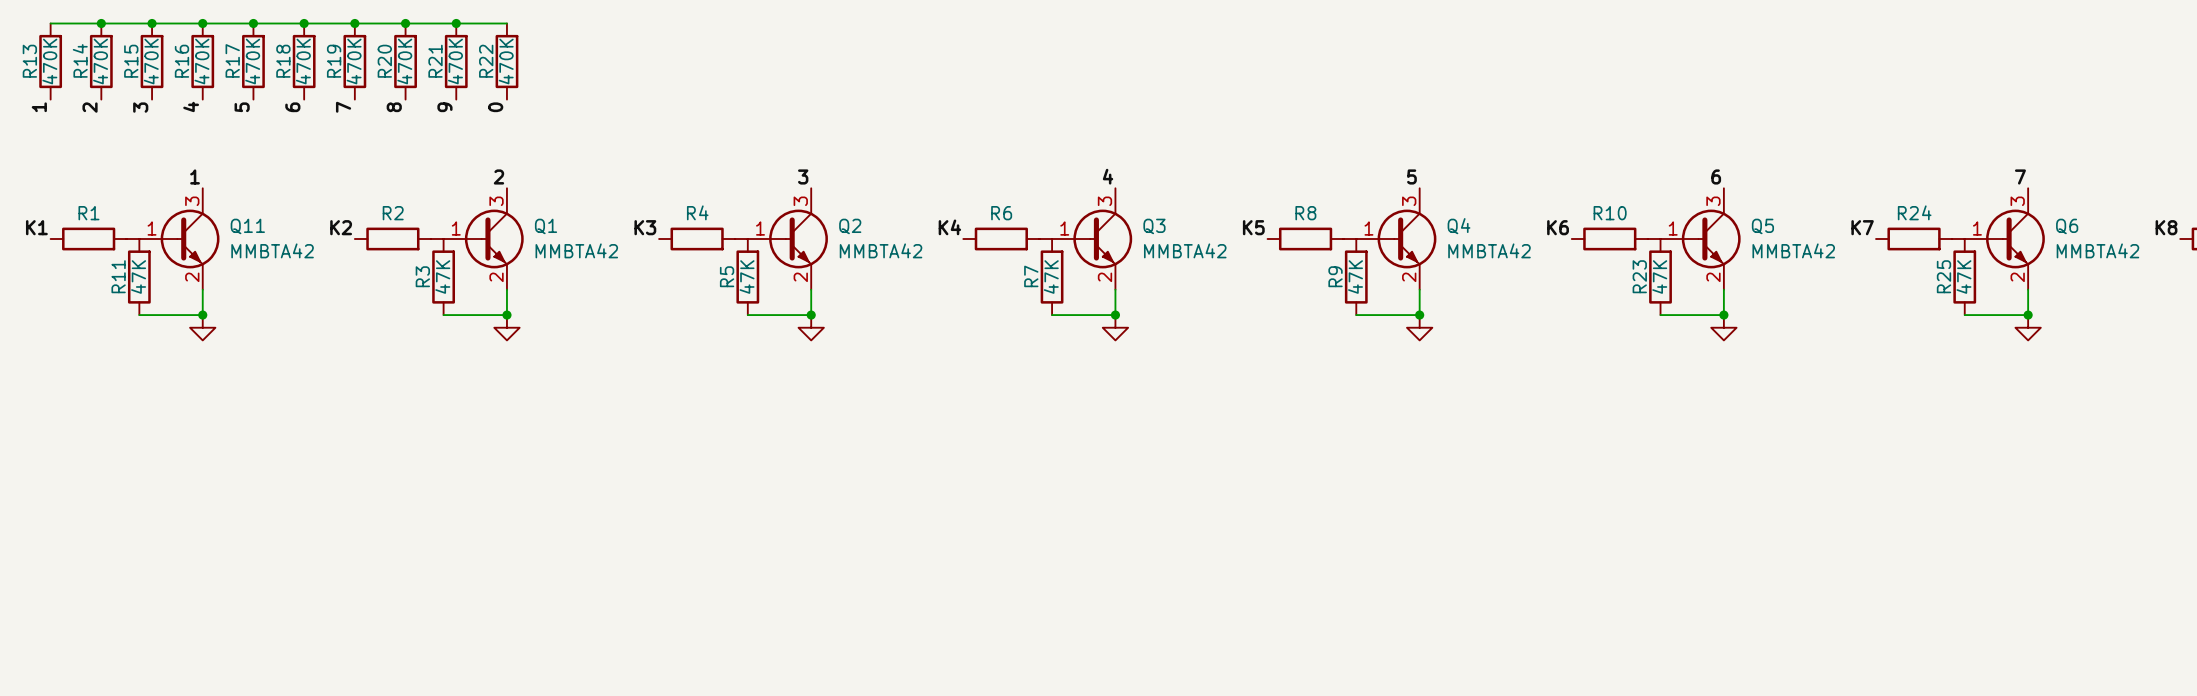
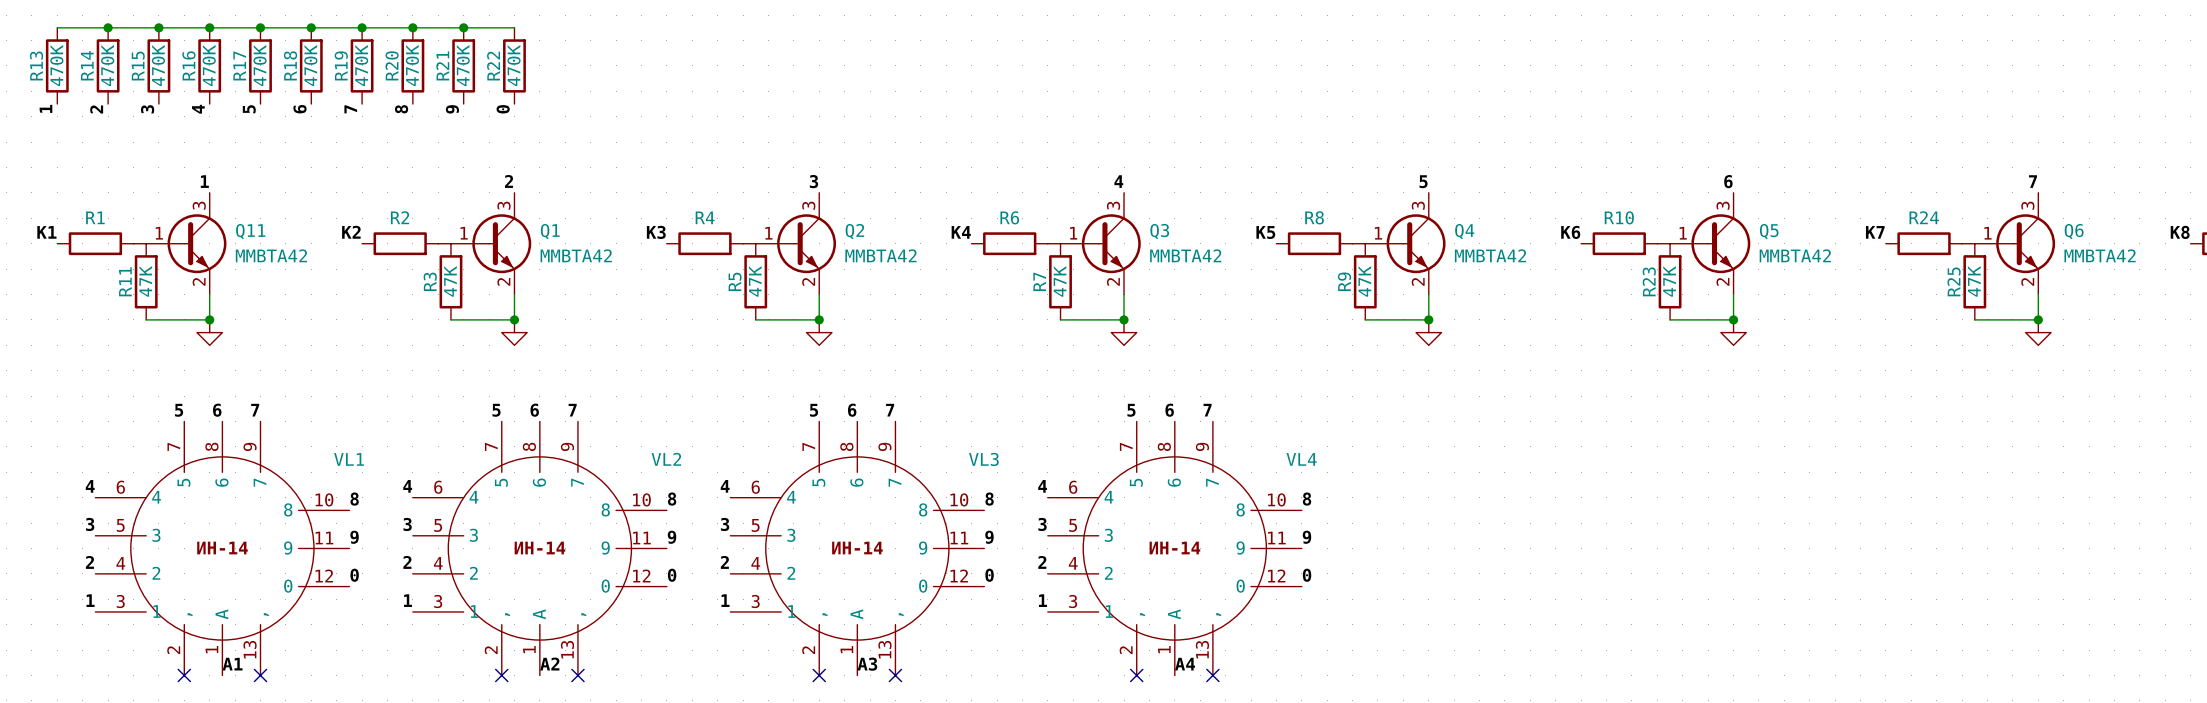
label: none -> 5 (179, 410)
label: none -> 6 (217, 410)
label: none -> 7 (255, 410)
label: none -> 5 (496, 410)
label: none -> 6 (534, 410)
label: none -> 7 (572, 410)
label: none -> 5 (814, 410)
label: none -> 6 (852, 410)
label: none -> 7 (890, 410)
label: none -> 5 (1131, 410)
label: none -> 6 (1169, 410)
label: none -> 7 (1207, 410)
label: none -> 4 (90, 486)
label: none -> 4 (407, 486)
label: none -> 4 (725, 486)
label: none -> 4 (1042, 486)
label: none -> 8 (354, 499)
label: none -> 8 (672, 499)
label: none -> 8 (989, 499)
label: none -> 8 (1307, 499)
label: none -> 3 (90, 524)
label: none -> 3 (407, 524)
label: none -> 3 (725, 524)
label: none -> 3 (1042, 524)
label: none -> 9 (354, 537)
label: none -> 9 (672, 537)
label: none -> 9 (989, 537)
label: none -> 9 (1306, 537)
VL1: none -> (222, 548)
VL2: none -> (539, 548)
VL3: none -> (857, 548)
VL4: none -> (1174, 548)
label: none -> 2 (89, 562)
label: none -> 2 (407, 562)
label: none -> 2 (724, 562)
label: none -> 2 (1042, 562)
label: none -> 0 (354, 575)
label: none -> 0 (672, 575)
label: none -> 0 (989, 575)
label: none -> 0 (1307, 575)
label: none -> 1 (90, 600)
label: none -> 1 (408, 600)
label: none -> 1 (725, 600)
label: none -> 1 (1042, 600)
label: none -> A1 (232, 664)
label: none -> A2 (549, 664)
label: none -> A3 (867, 664)
label: none -> A4 (1185, 664)
no-connect mark: none -> (184, 675)
no-connect mark: none -> (260, 675)
no-connect mark: none -> (501, 675)
no-connect mark: none -> (577, 675)
no-connect mark: none -> (819, 675)
no-connect mark: none -> (895, 675)
no-connect mark: none -> (1136, 675)
no-connect mark: none -> (1212, 675)

